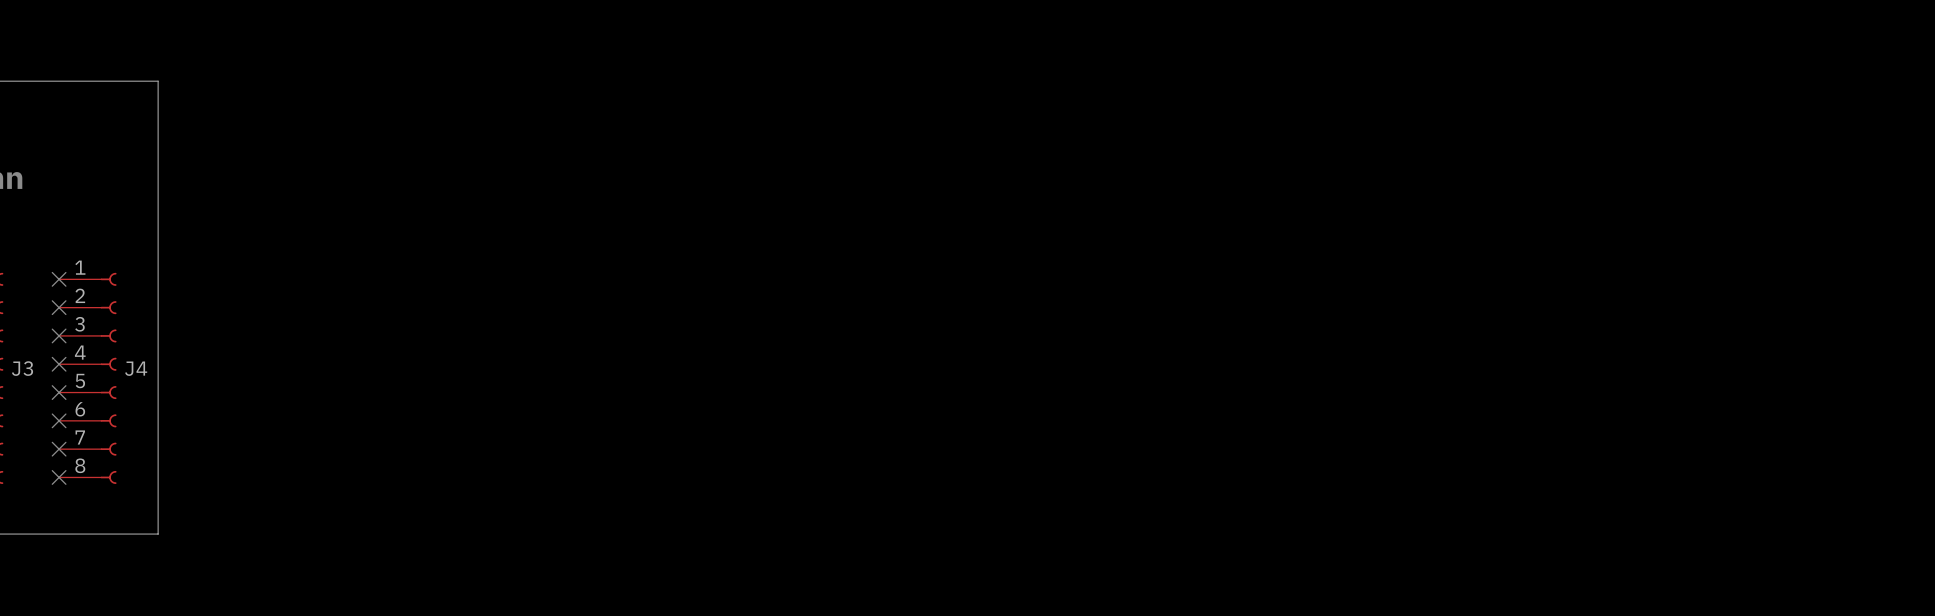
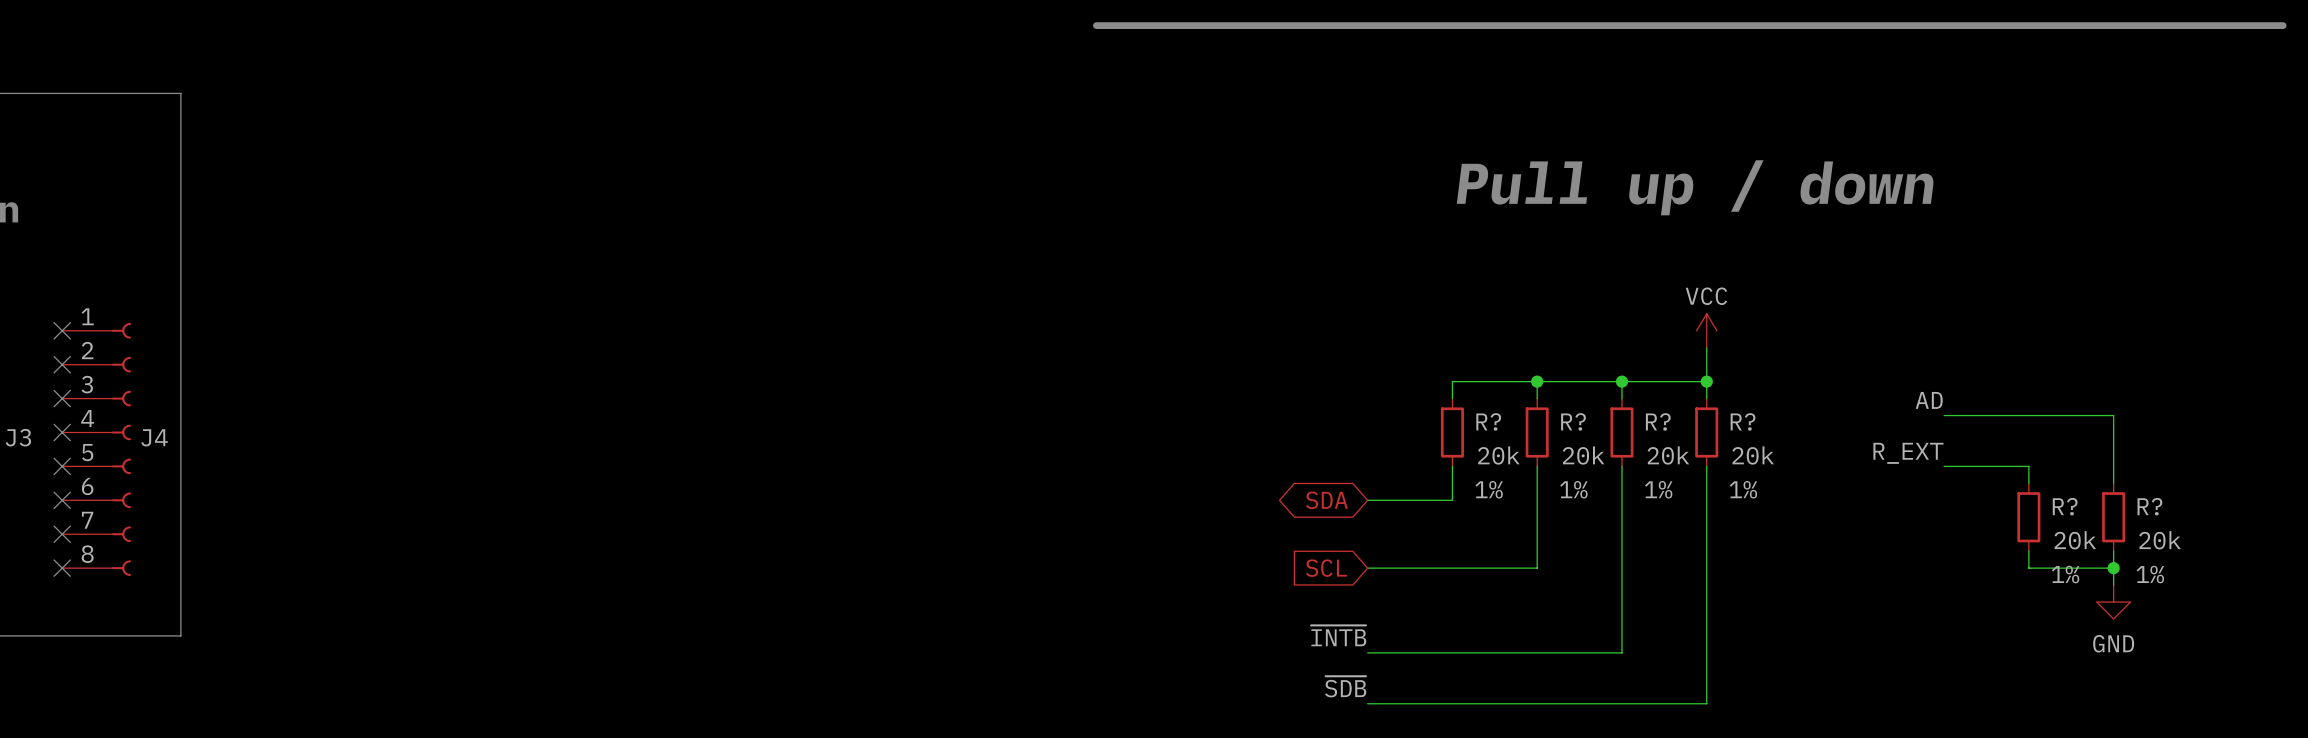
line: none -> (1096, 25) (2283, 25)
text: none -> Pull up / down (1695, 187)
power symbol: none -> VCC (1706, 330)
wire: none -> (1706, 347) (1706, 398)
wire: none -> (1537, 381) (1537, 398)
junction: none -> (1537, 381)
wire: none -> (1621, 381) (1621, 398)
junction: none -> (1621, 381)
wire: none -> (1706, 381) (1452, 381) (1452, 398)
junction: none -> (1706, 381)
label: none -> AD (1929, 400)
wire: none -> (1944, 415) (2113, 415) (2113, 483)
R?: none -> 20k (1452, 432)
R?: none -> 20k (1537, 432)
R?: none -> 20k (1621, 432)
R?: none -> 20k (1706, 432)
label: none -> R_EXT (1908, 453)
wire: none -> (1452, 466) (1452, 500) (1367, 500)
wire: none -> (1537, 466) (1537, 568) (1367, 568)
wire: none -> (1621, 466) (1621, 652) (1367, 652)
wire: none -> (1706, 466) (1706, 703) (1367, 703)
wire: none -> (1944, 466) (2028, 466) (2028, 483)
global label: none -> SDA (1326, 500)
R?: none -> 20k (2028, 517)
R?: none -> 20k (2113, 517)
wire: none -> (2028, 551) (2028, 568) (2113, 568)
wire: none -> (2113, 551) (2113, 585)
global label: none -> SCL (1326, 568)
junction: none -> (2113, 568)
power symbol: none -> GND (2113, 602)
label: none -> ~{INTB} (1338, 635)
label: none -> ~{SDB} (1345, 686)

